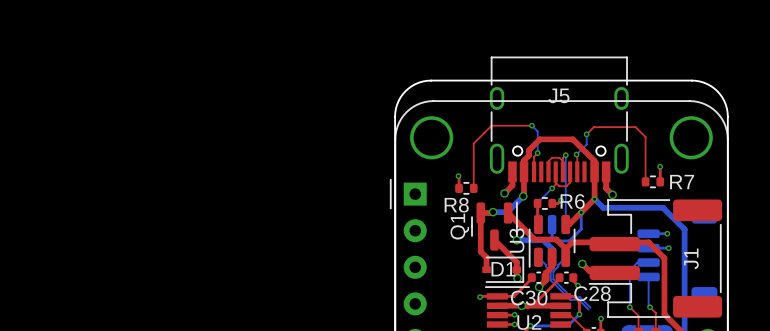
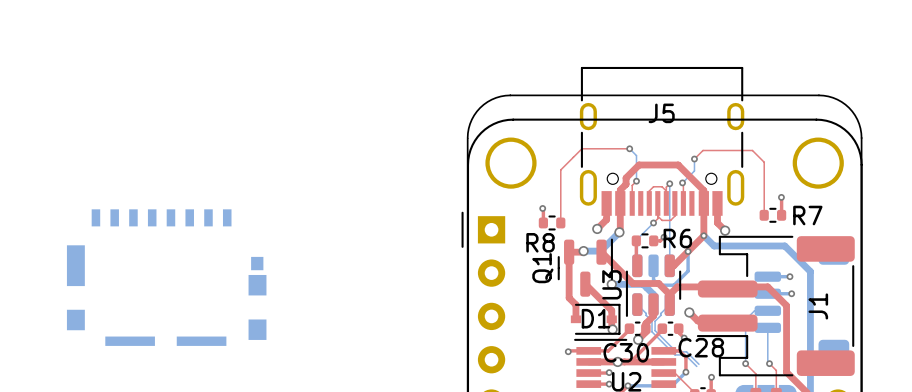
part: none -> (166, 277)

